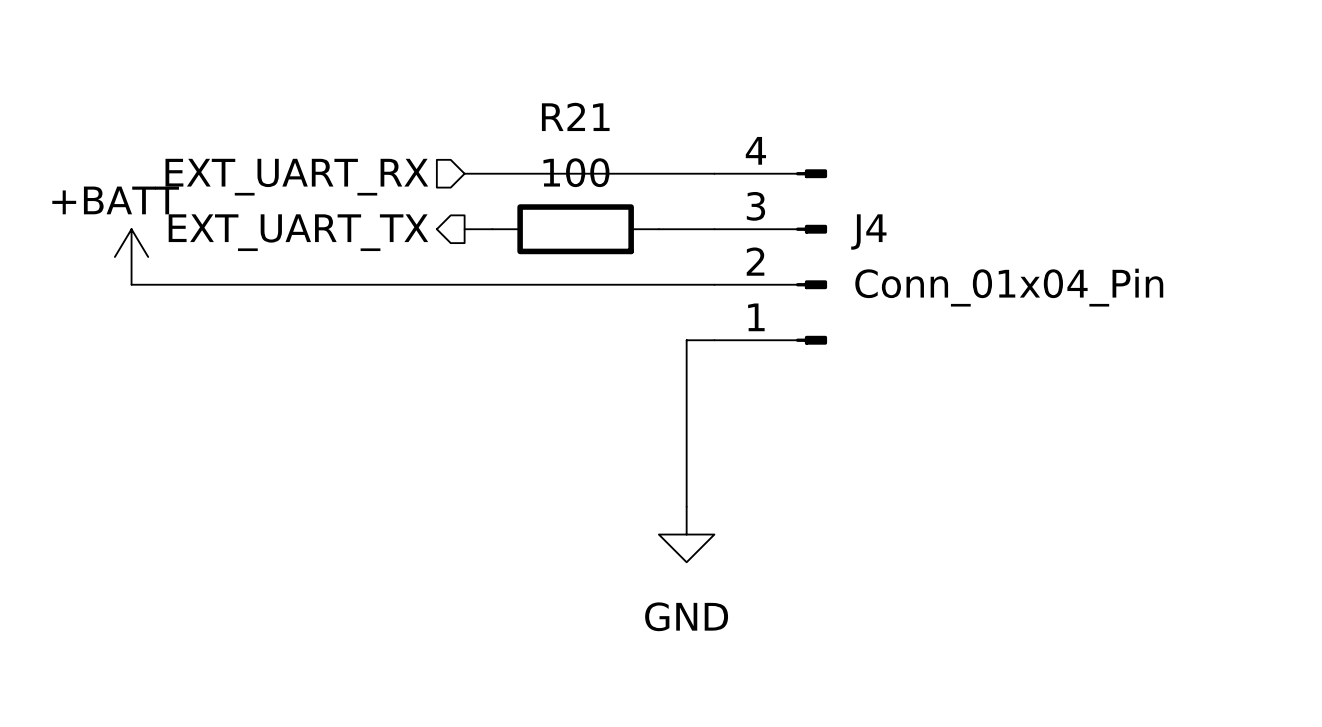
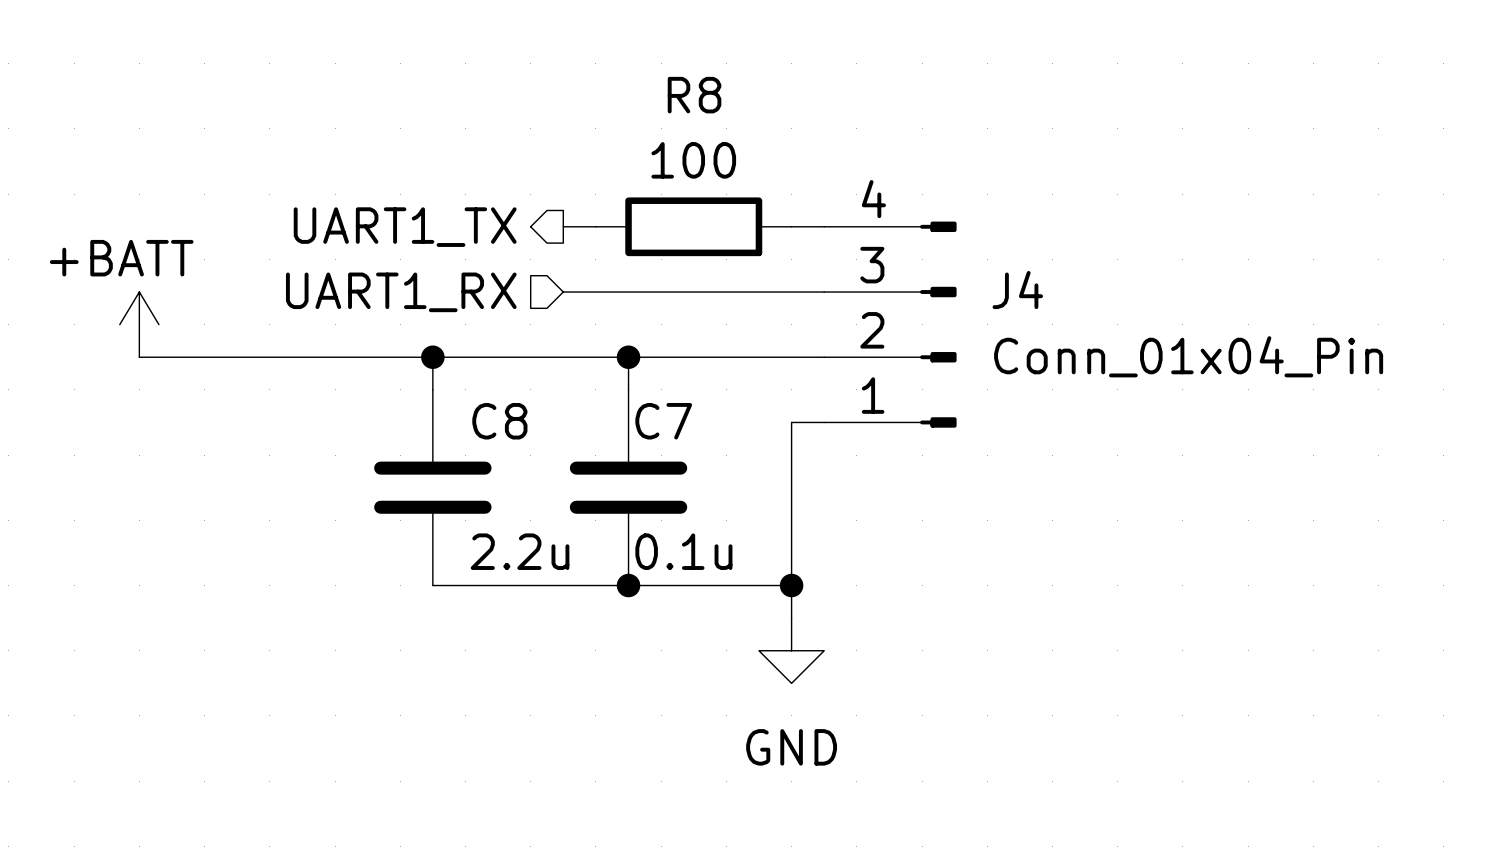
wire: (464, 173) (492, 173) -> none
wire: (520, 173) (686, 173) -> none
R8: none -> 100 (693, 226)
hierarchical label shape: input (296, 177) -> output (405, 227)
hierarchical label: EXT_UART_RX (296, 177) -> UART1_TX (405, 227)
wire: (464, 229) (492, 229) -> (758, 292) (563, 292)
R21: 100 (575, 229) -> none
hierarchical label shape: output (298, 232) -> input (401, 292)
hierarchical label: EXT_UART_TX (298, 232) -> UART1_RX (401, 292)
wire: none -> (432, 357) (432, 389)
junction: none -> (432, 357)
wire: none -> (628, 357) (628, 389)
junction: none -> (628, 357)
C8: none -> 2.2u (432, 487)
C7: none -> 0.1u (628, 487)
wire: none -> (432, 585) (791, 585)
junction: none -> (628, 585)
junction: none -> (791, 585)

